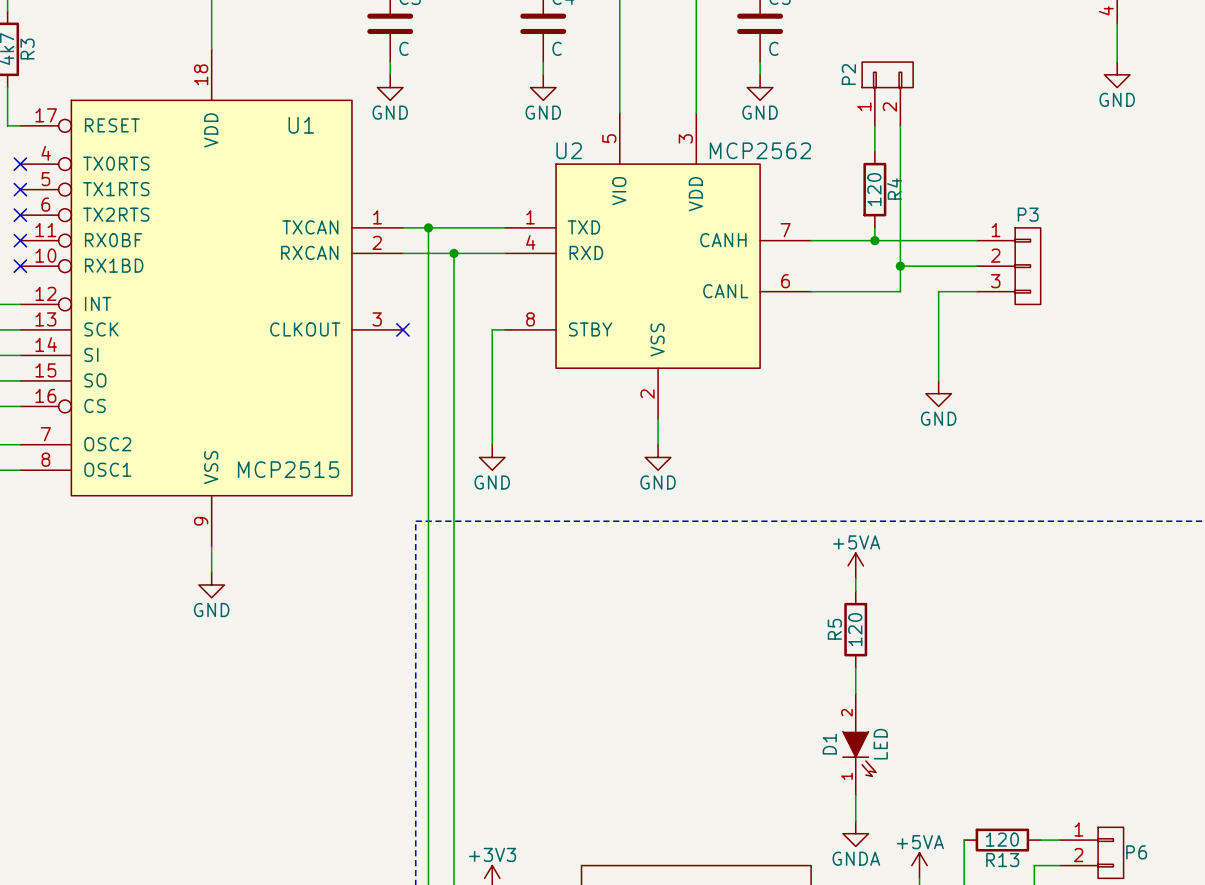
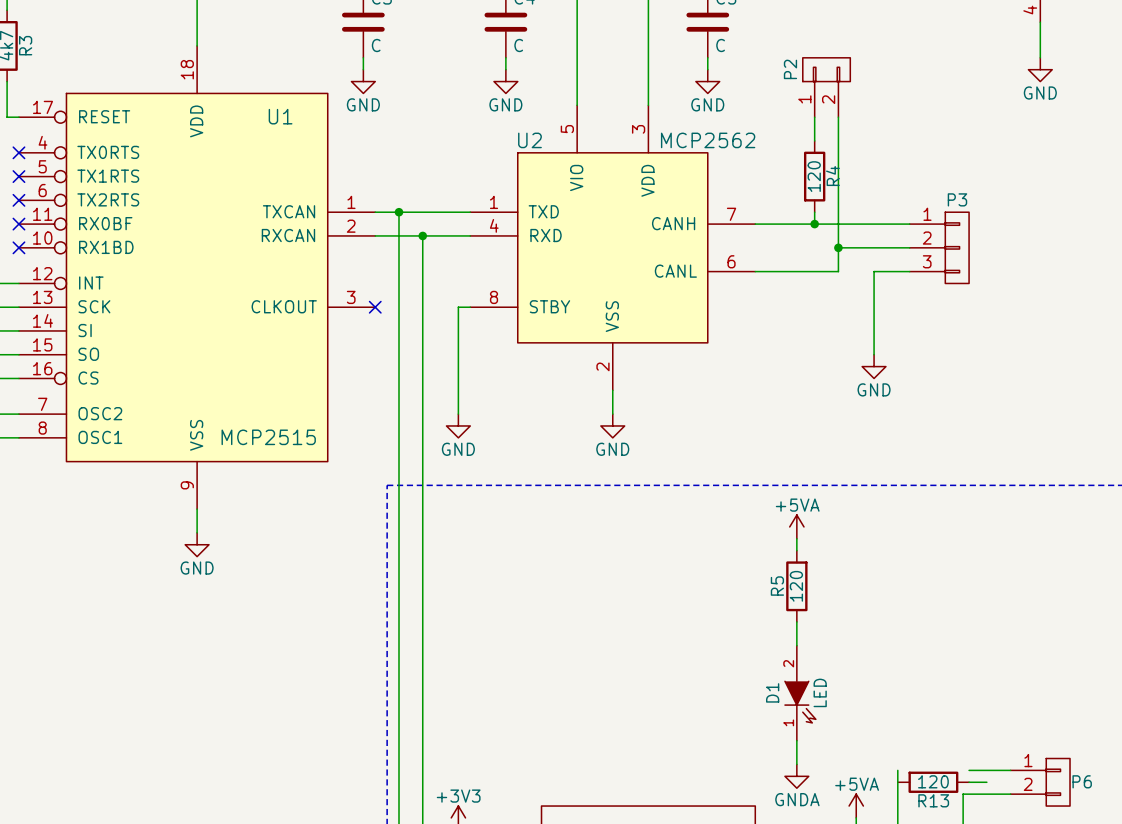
wire: none -> (897, 770) (897, 782)
wire: none -> (969, 770) (1010, 770)
P6 position: (1091, 852) -> (1040, 782)
wire: (1034, 865) (1059, 865) -> (963, 806) (963, 794) (1010, 794)

